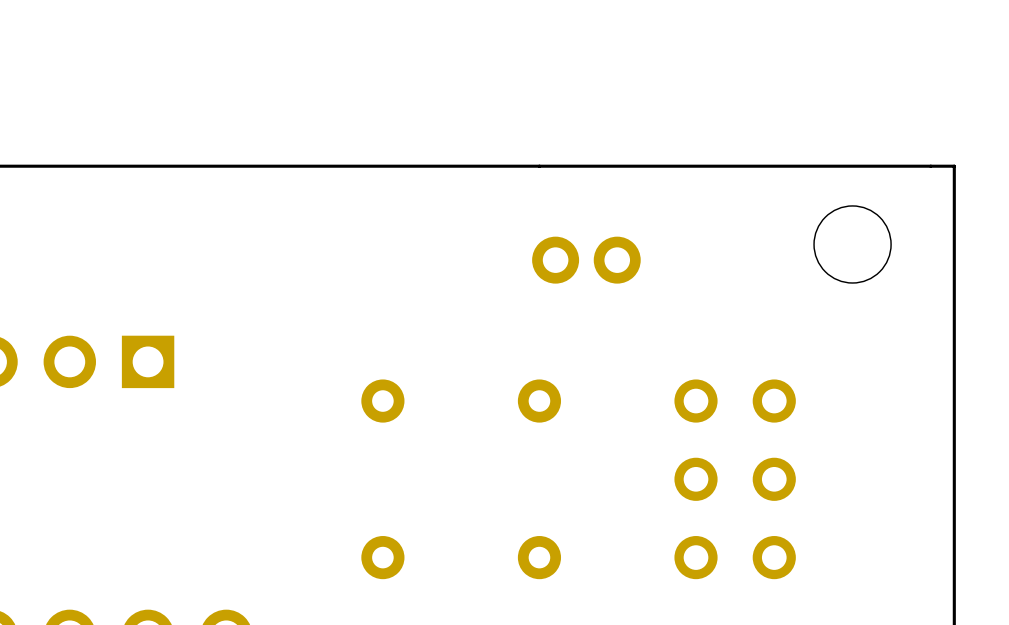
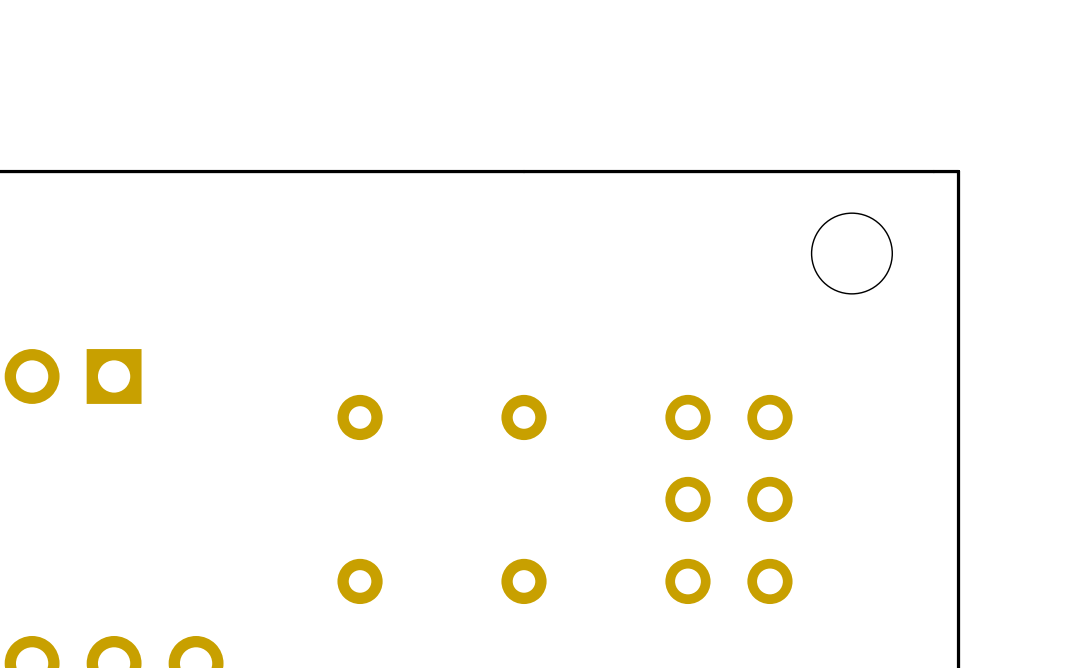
part: (586, 260) -> none

